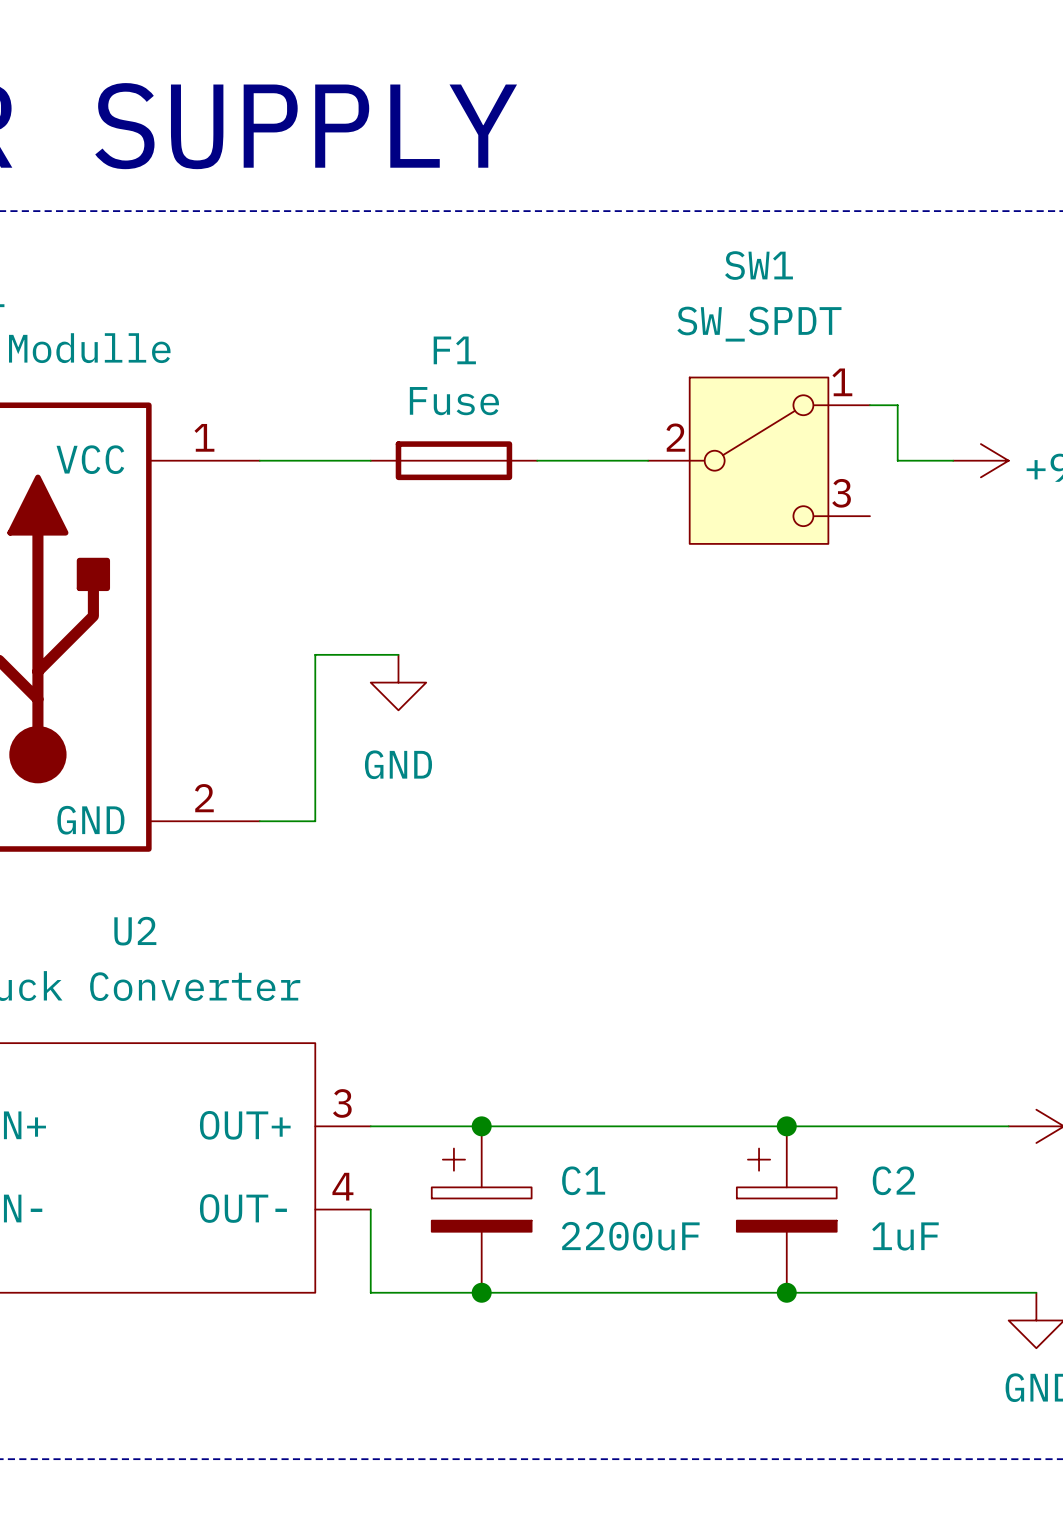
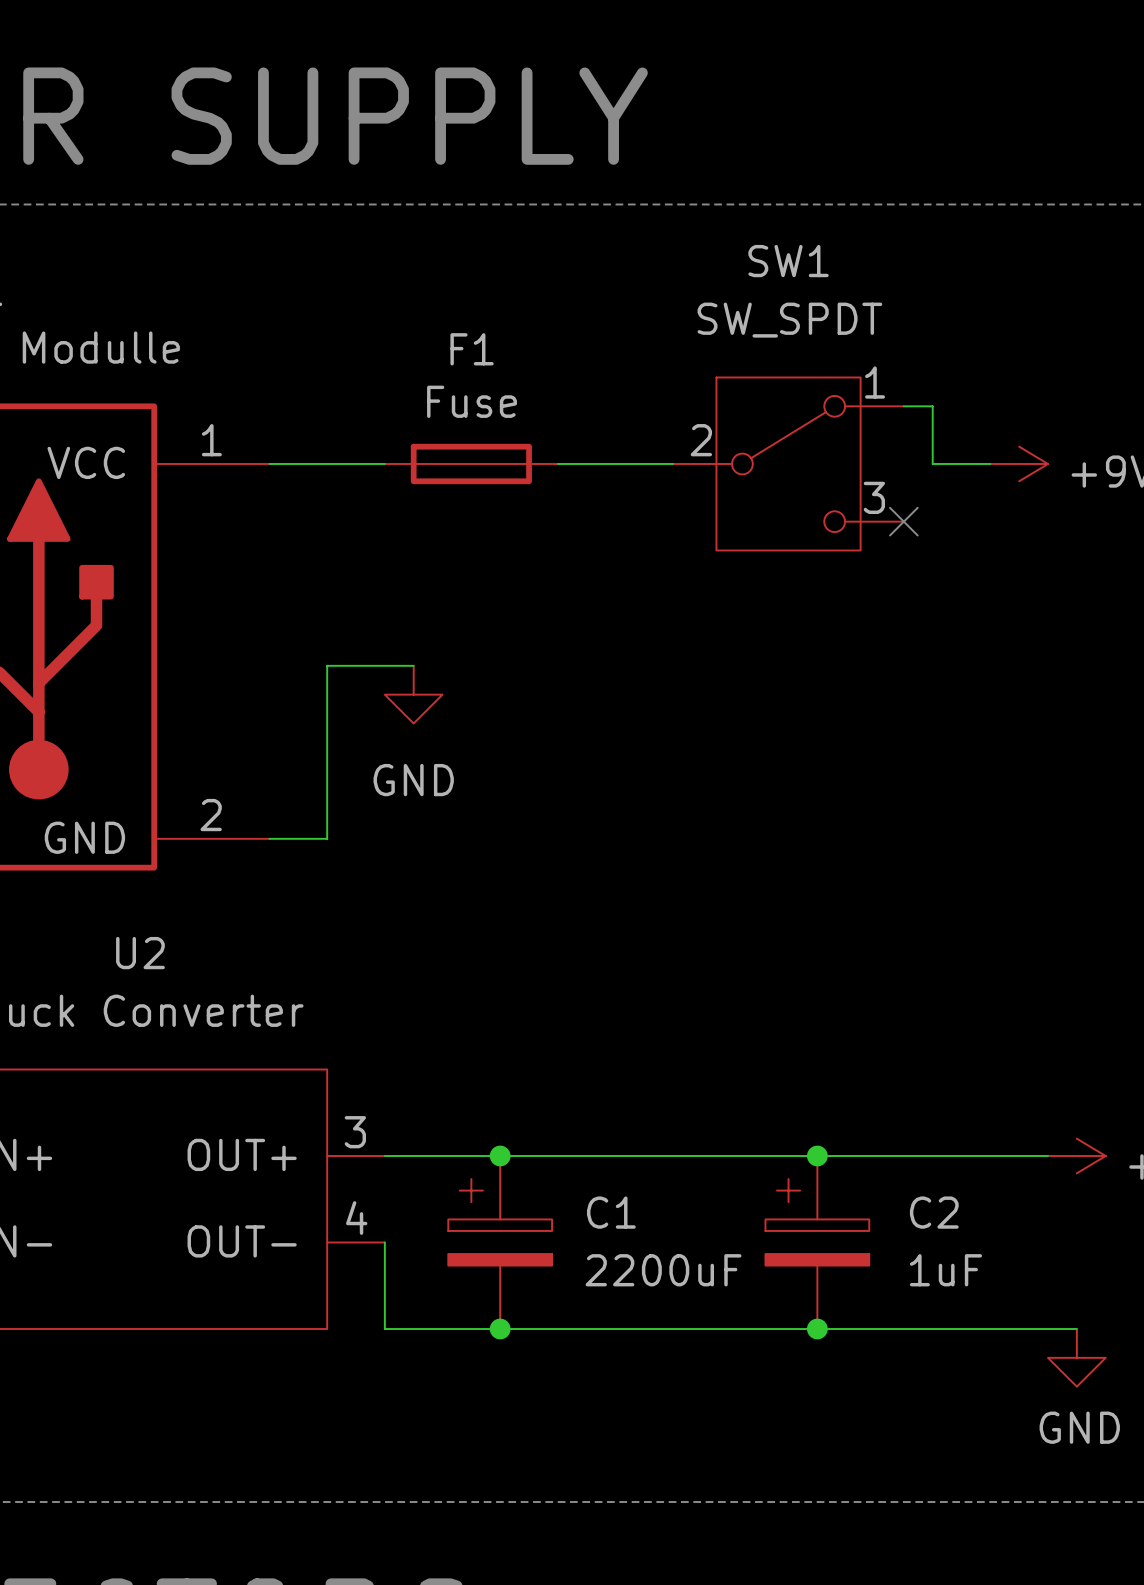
no-connect mark: none -> (903, 521)

